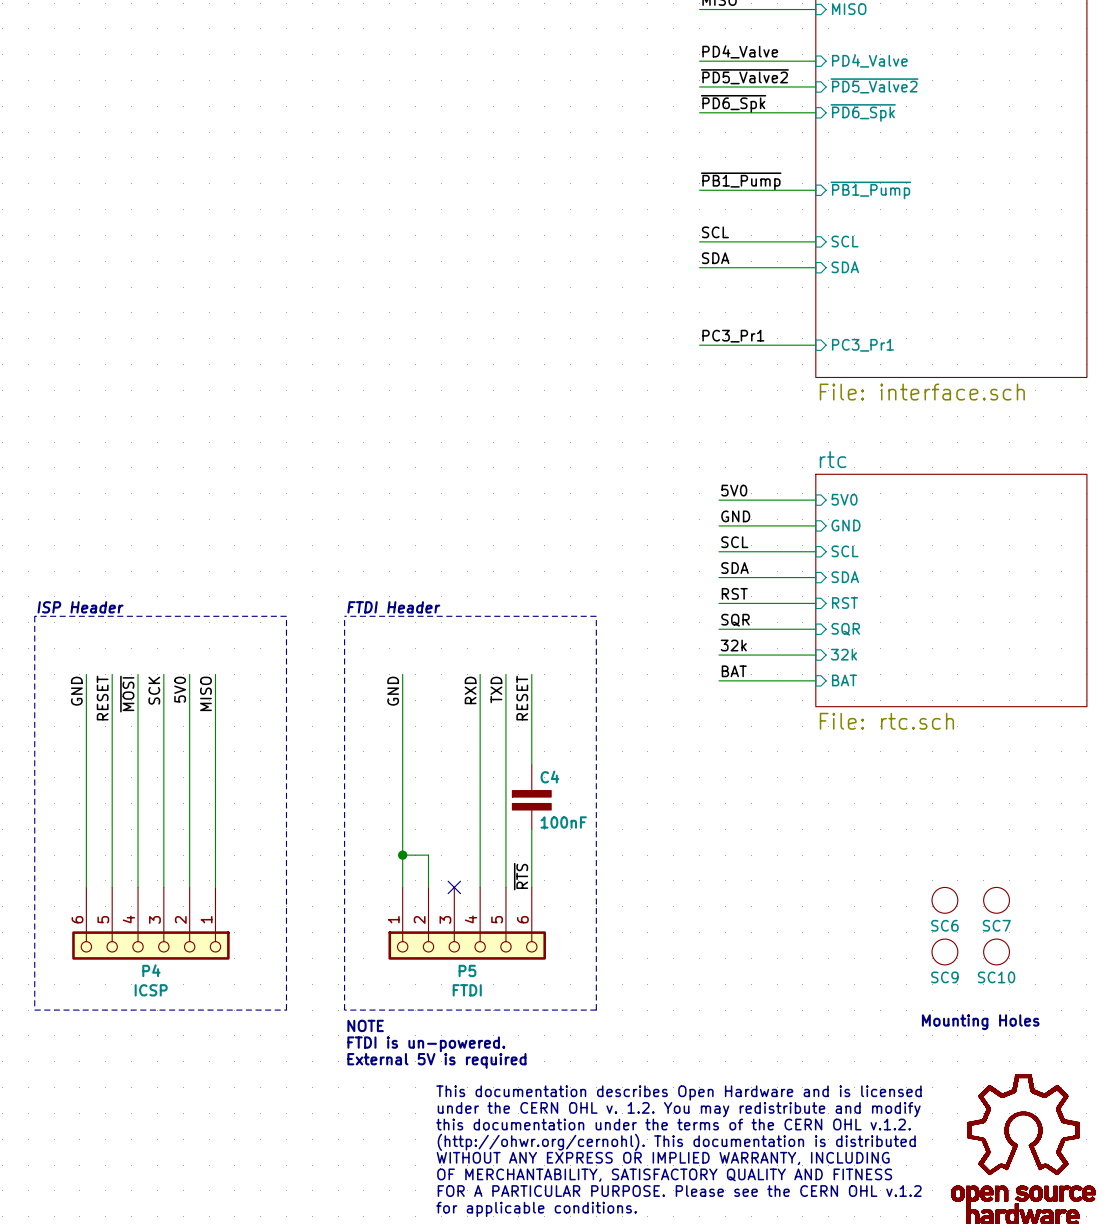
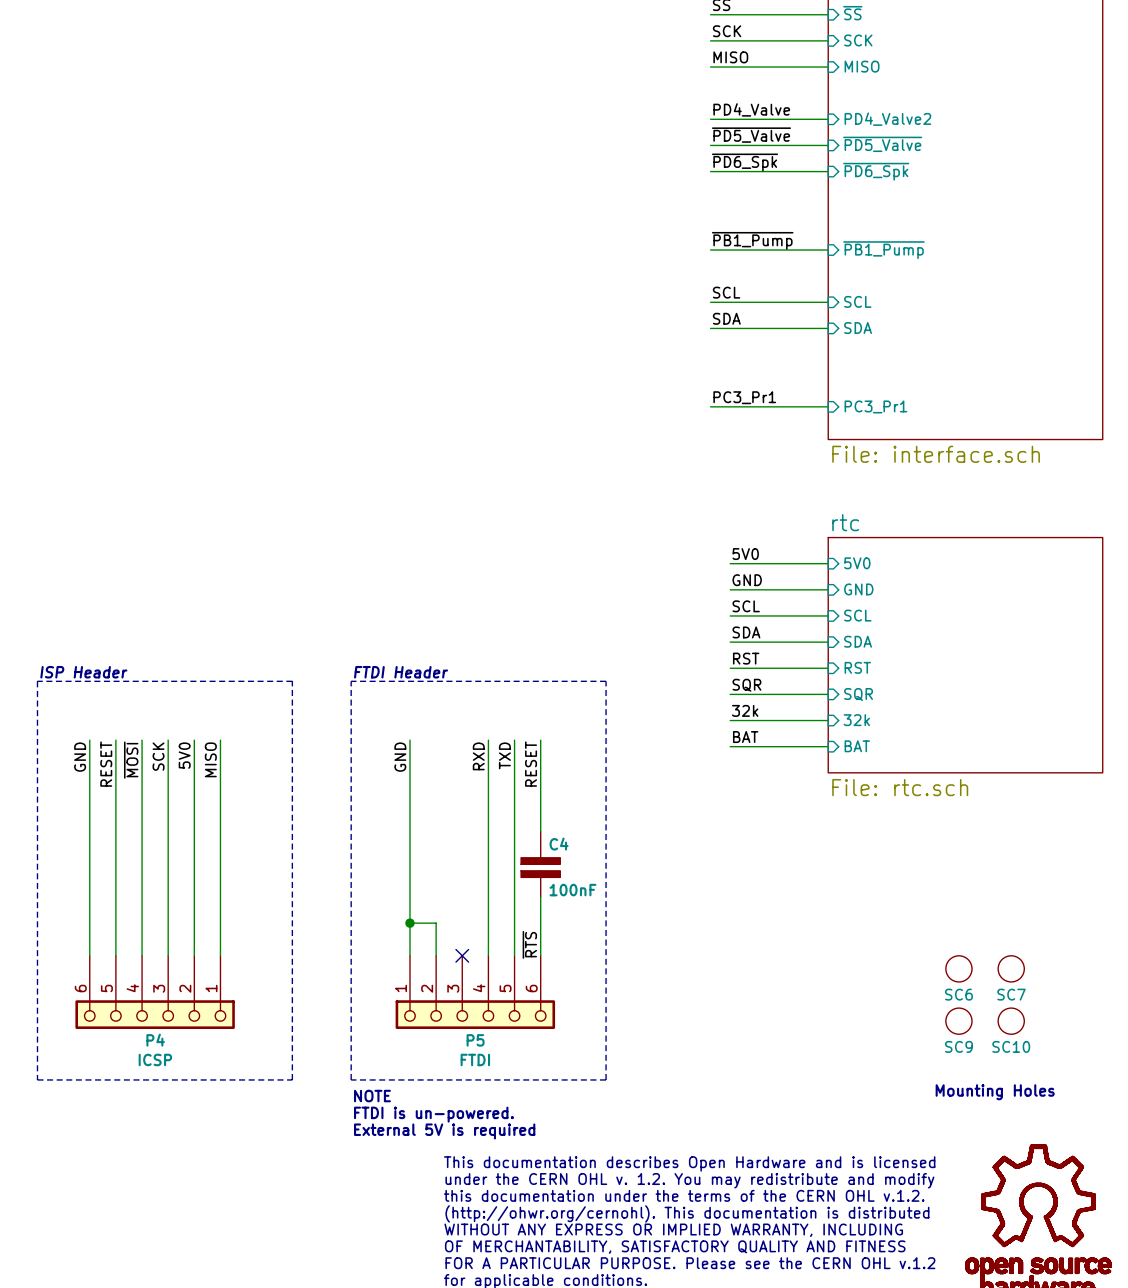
sheet pin: PD4_Valve (869, 61) -> PD4_Valve2 (887, 119)
label: ~{PD5_Valve2} (744, 76) -> ~{PD5_Valve} (751, 135)
sheet pin: ~{PD5_Valve2} (874, 85) -> ~{PD5_Valve} (882, 144)

